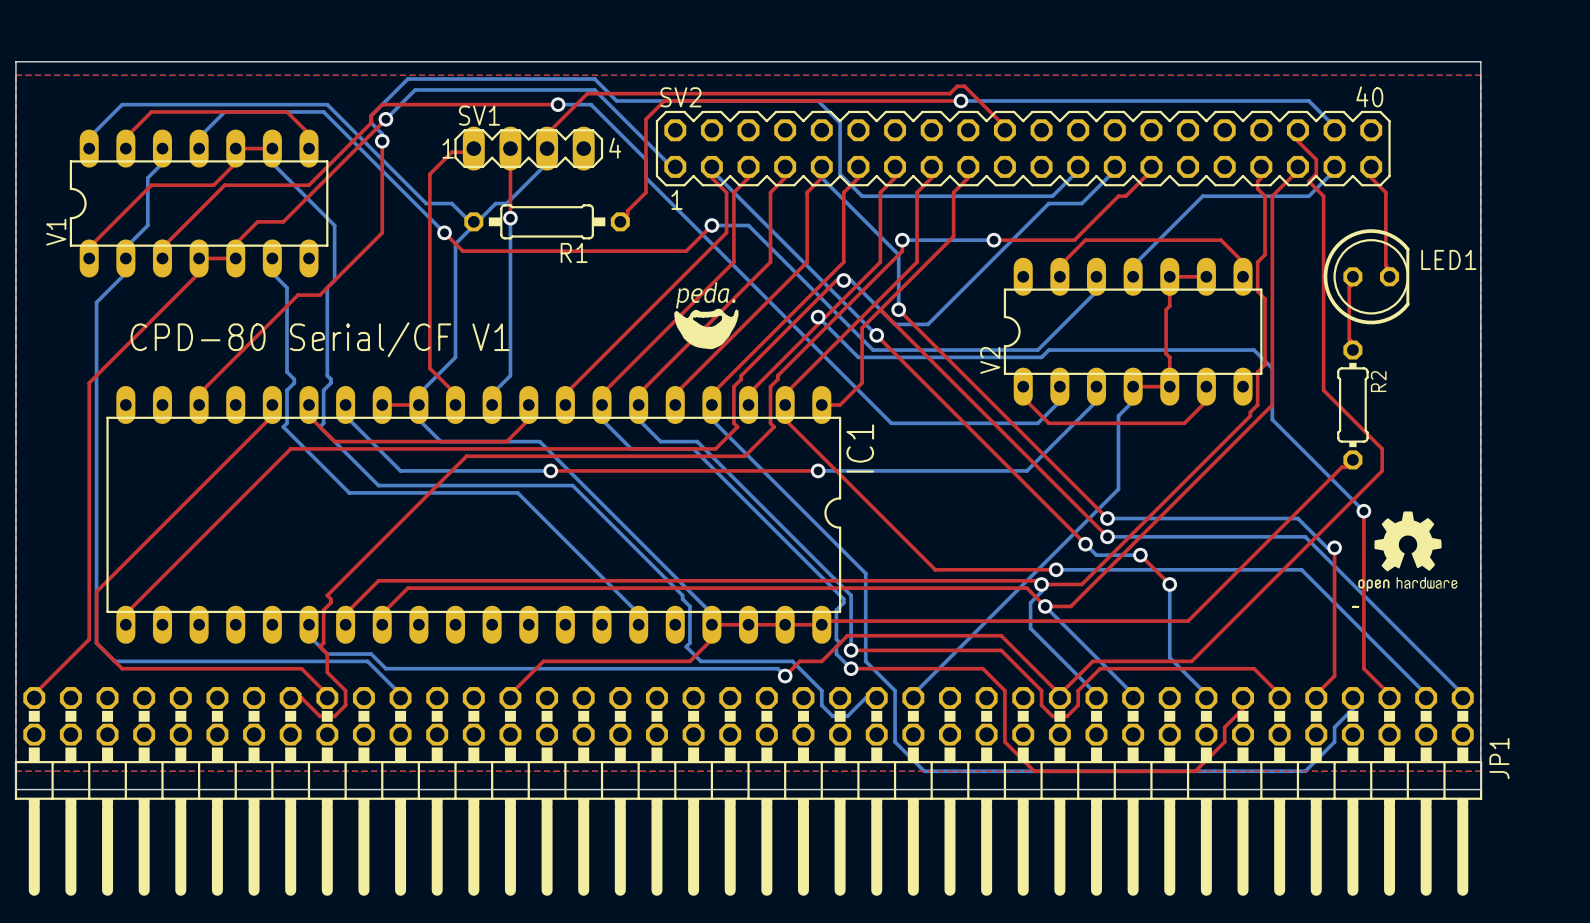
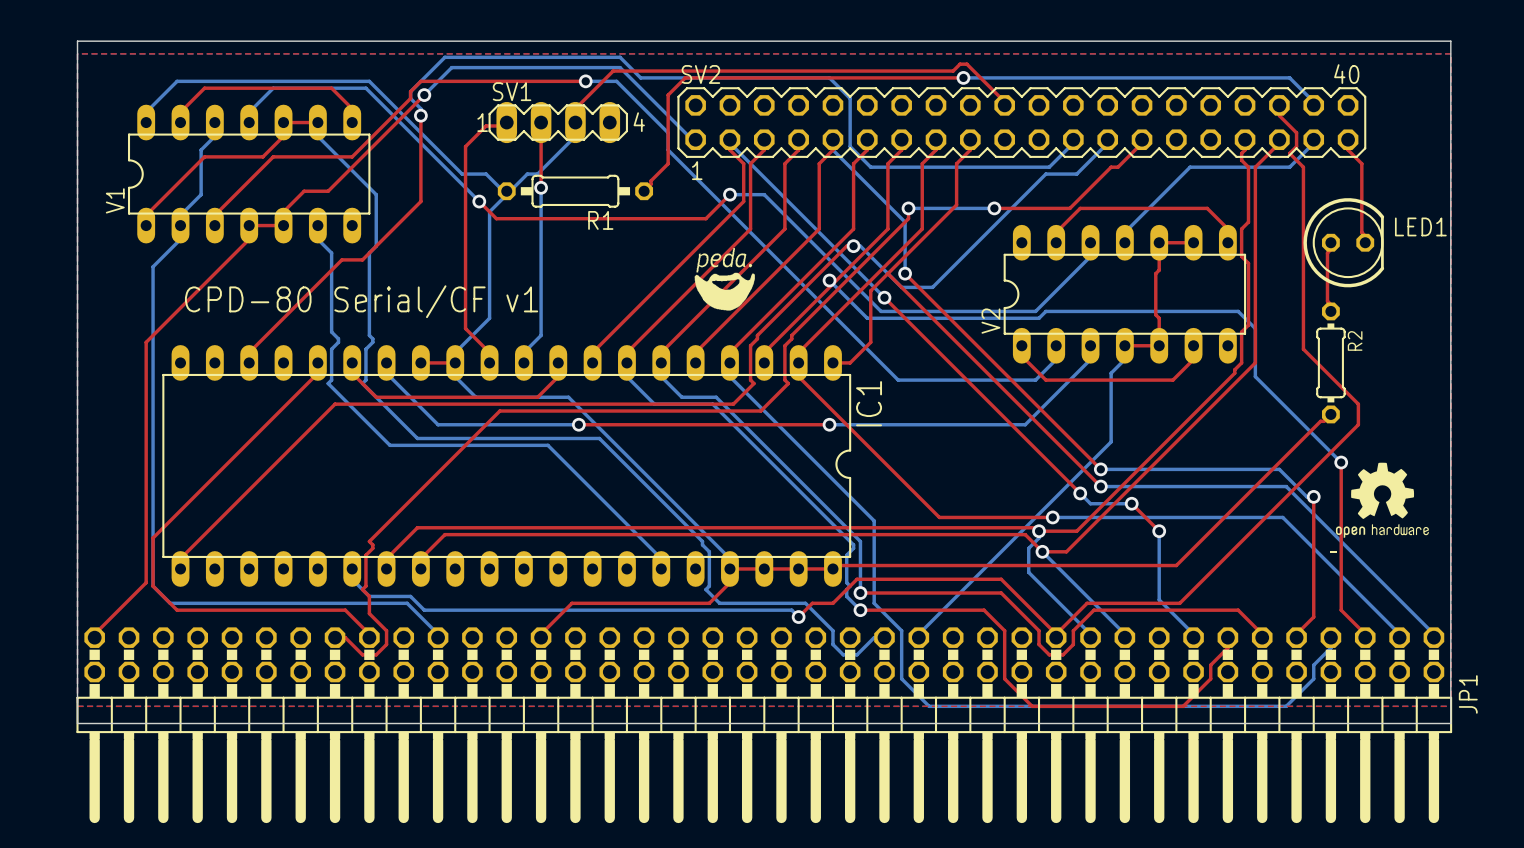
text: CPD-80 Serial/CF V1 (320, 339) -> CPD-80 Serial/CF v1 (361, 301)

